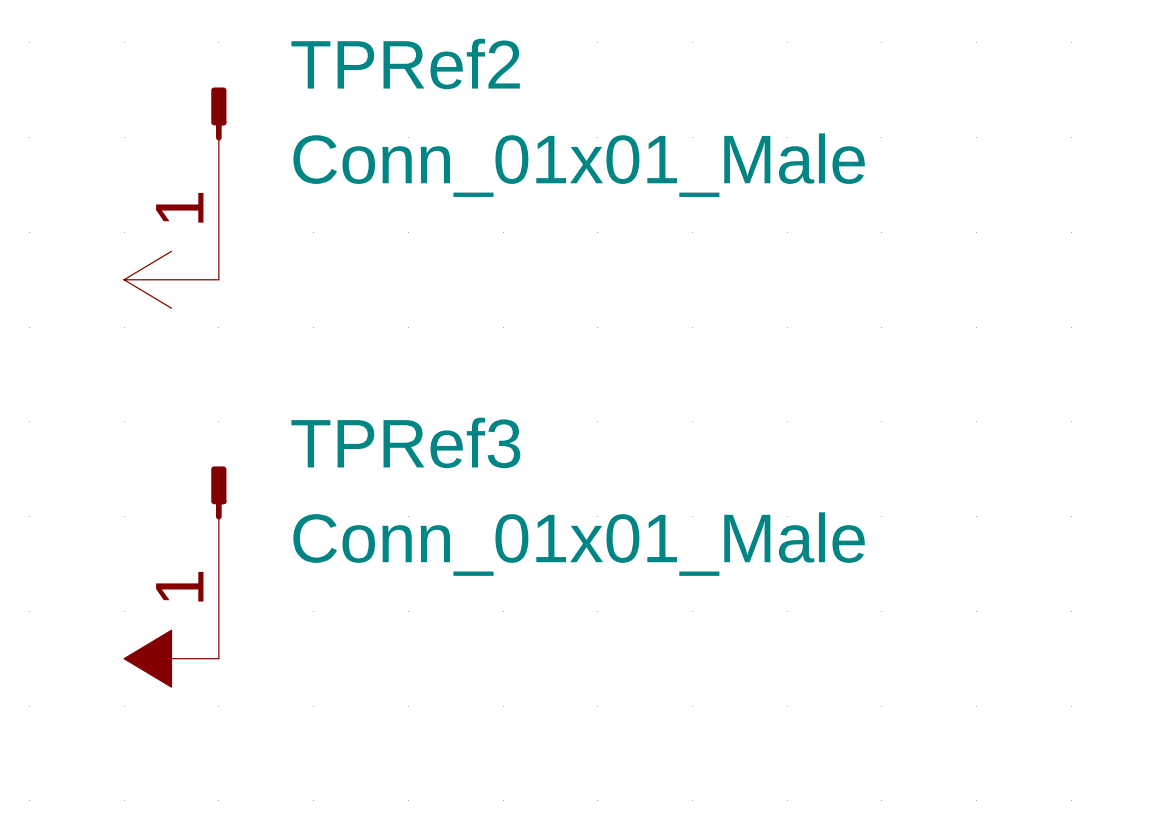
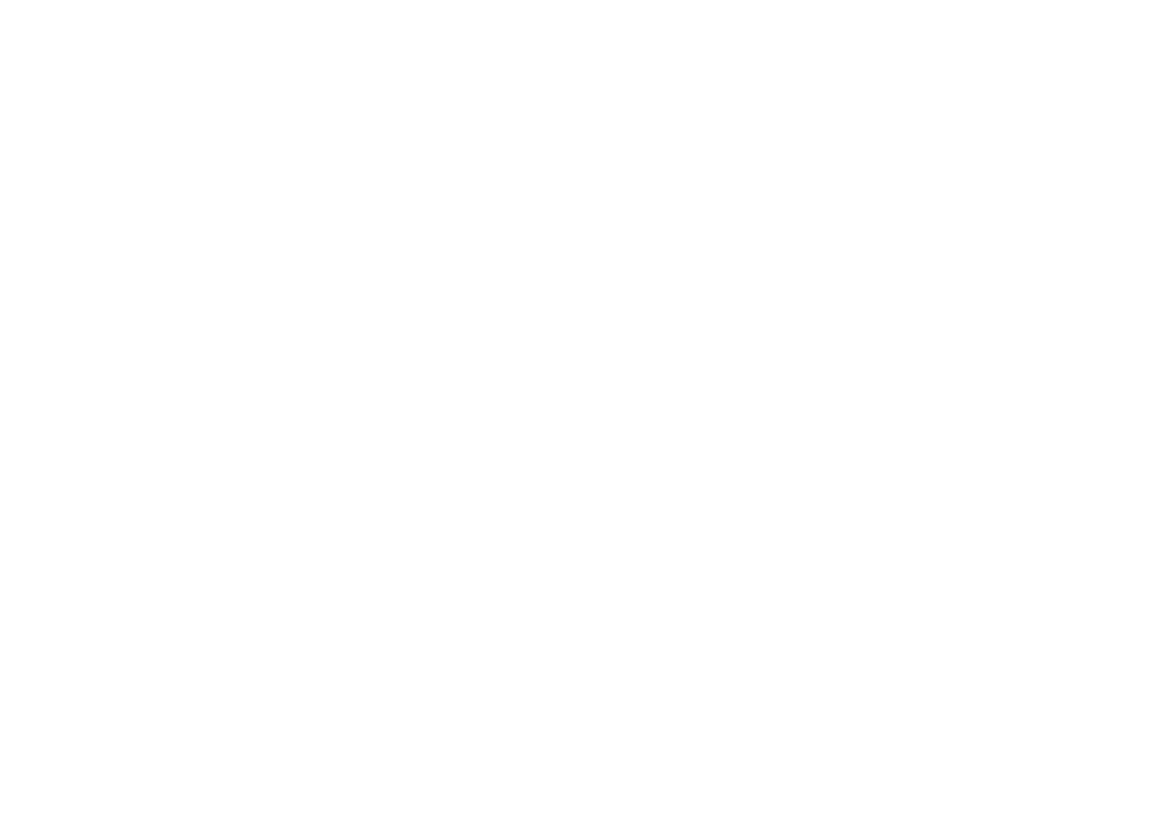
TPRef2: Conn_01x01_Male (218, 183) -> none
power symbol: (171, 279) -> none
TPRef3: Conn_01x01_Male (218, 562) -> none
power symbol: (171, 658) -> none

